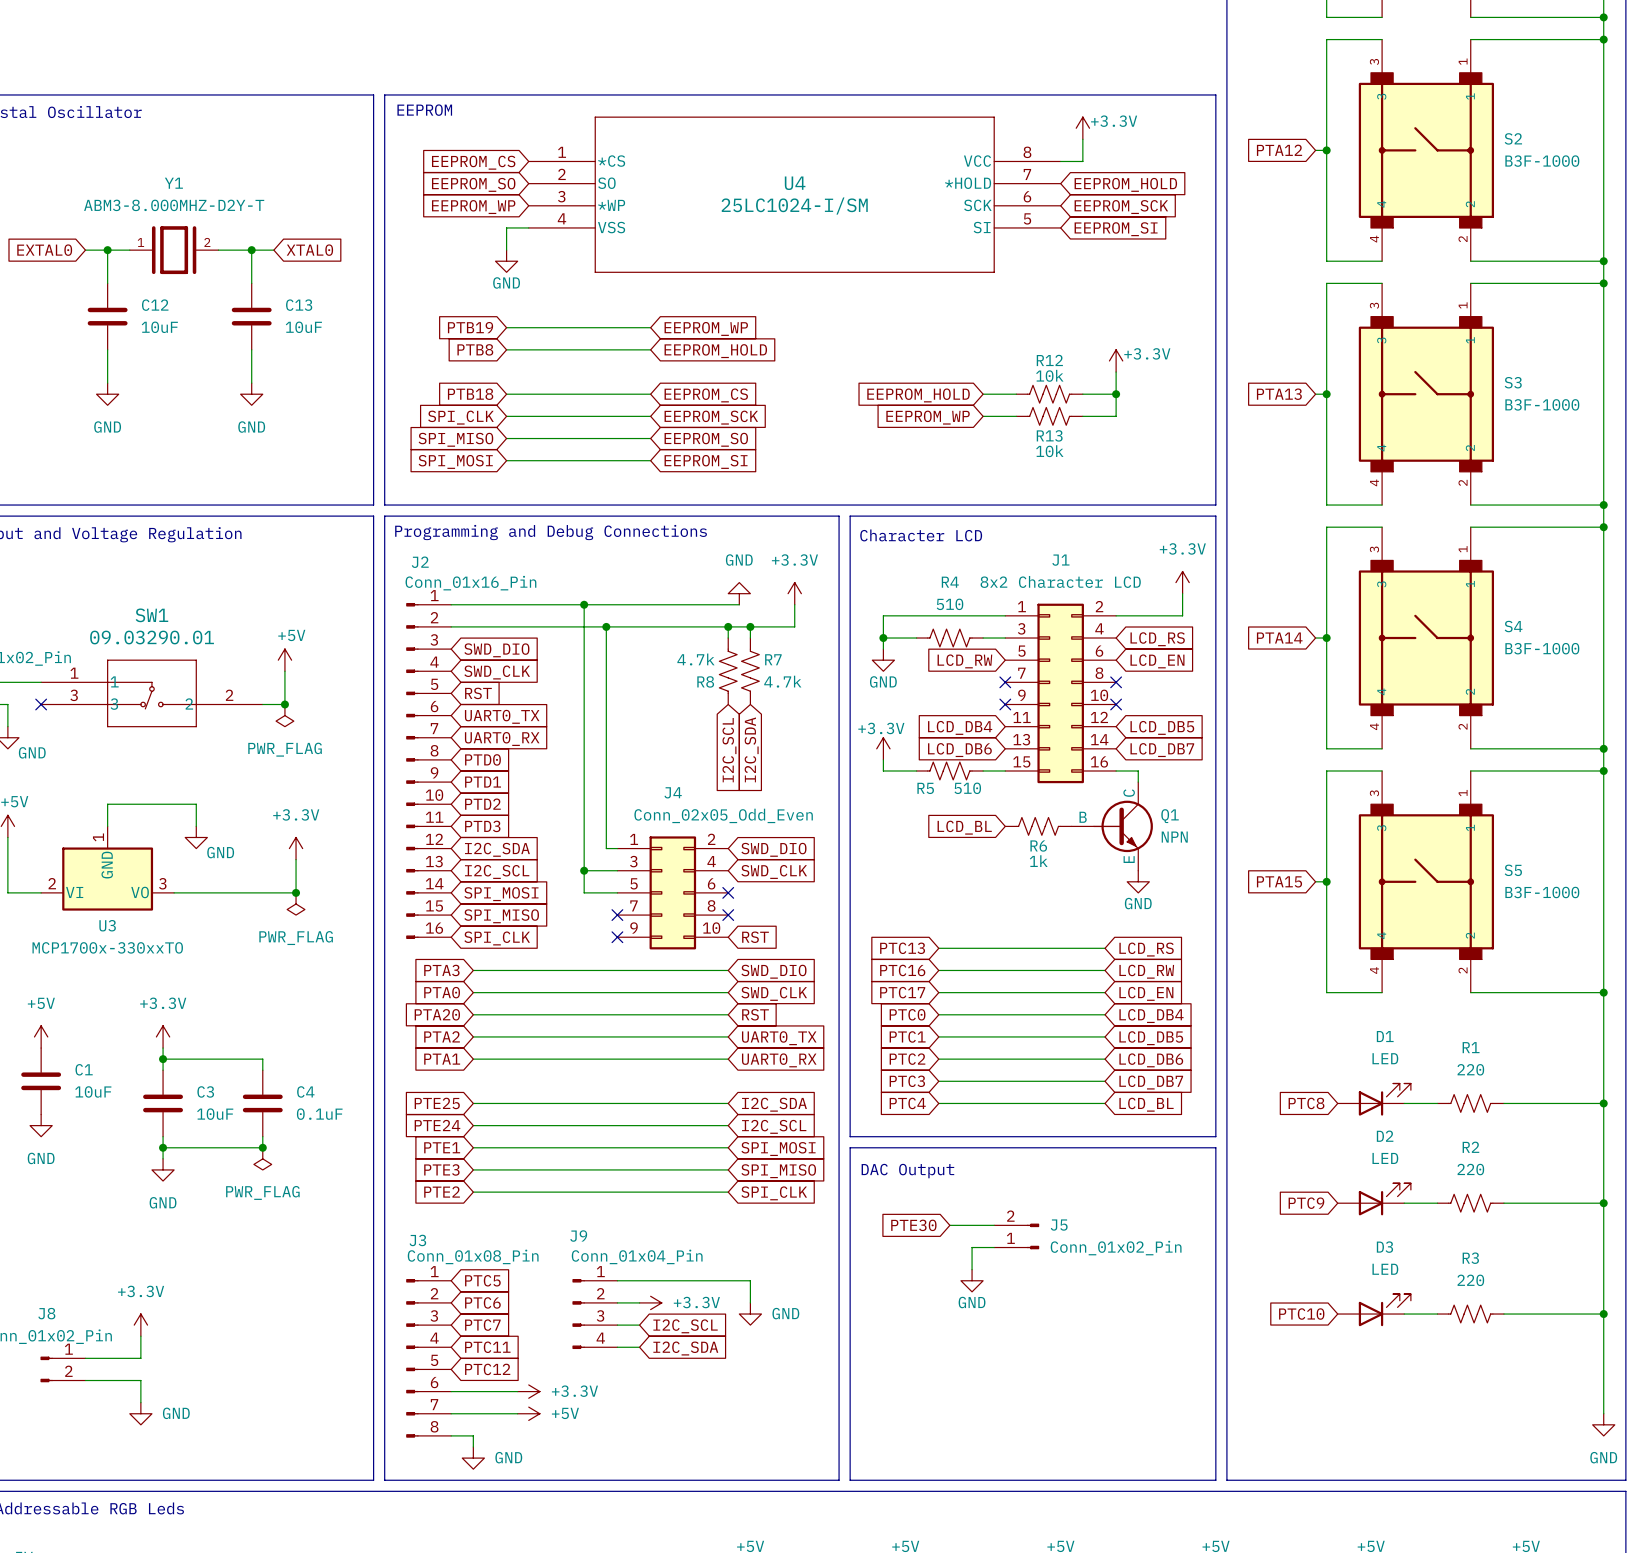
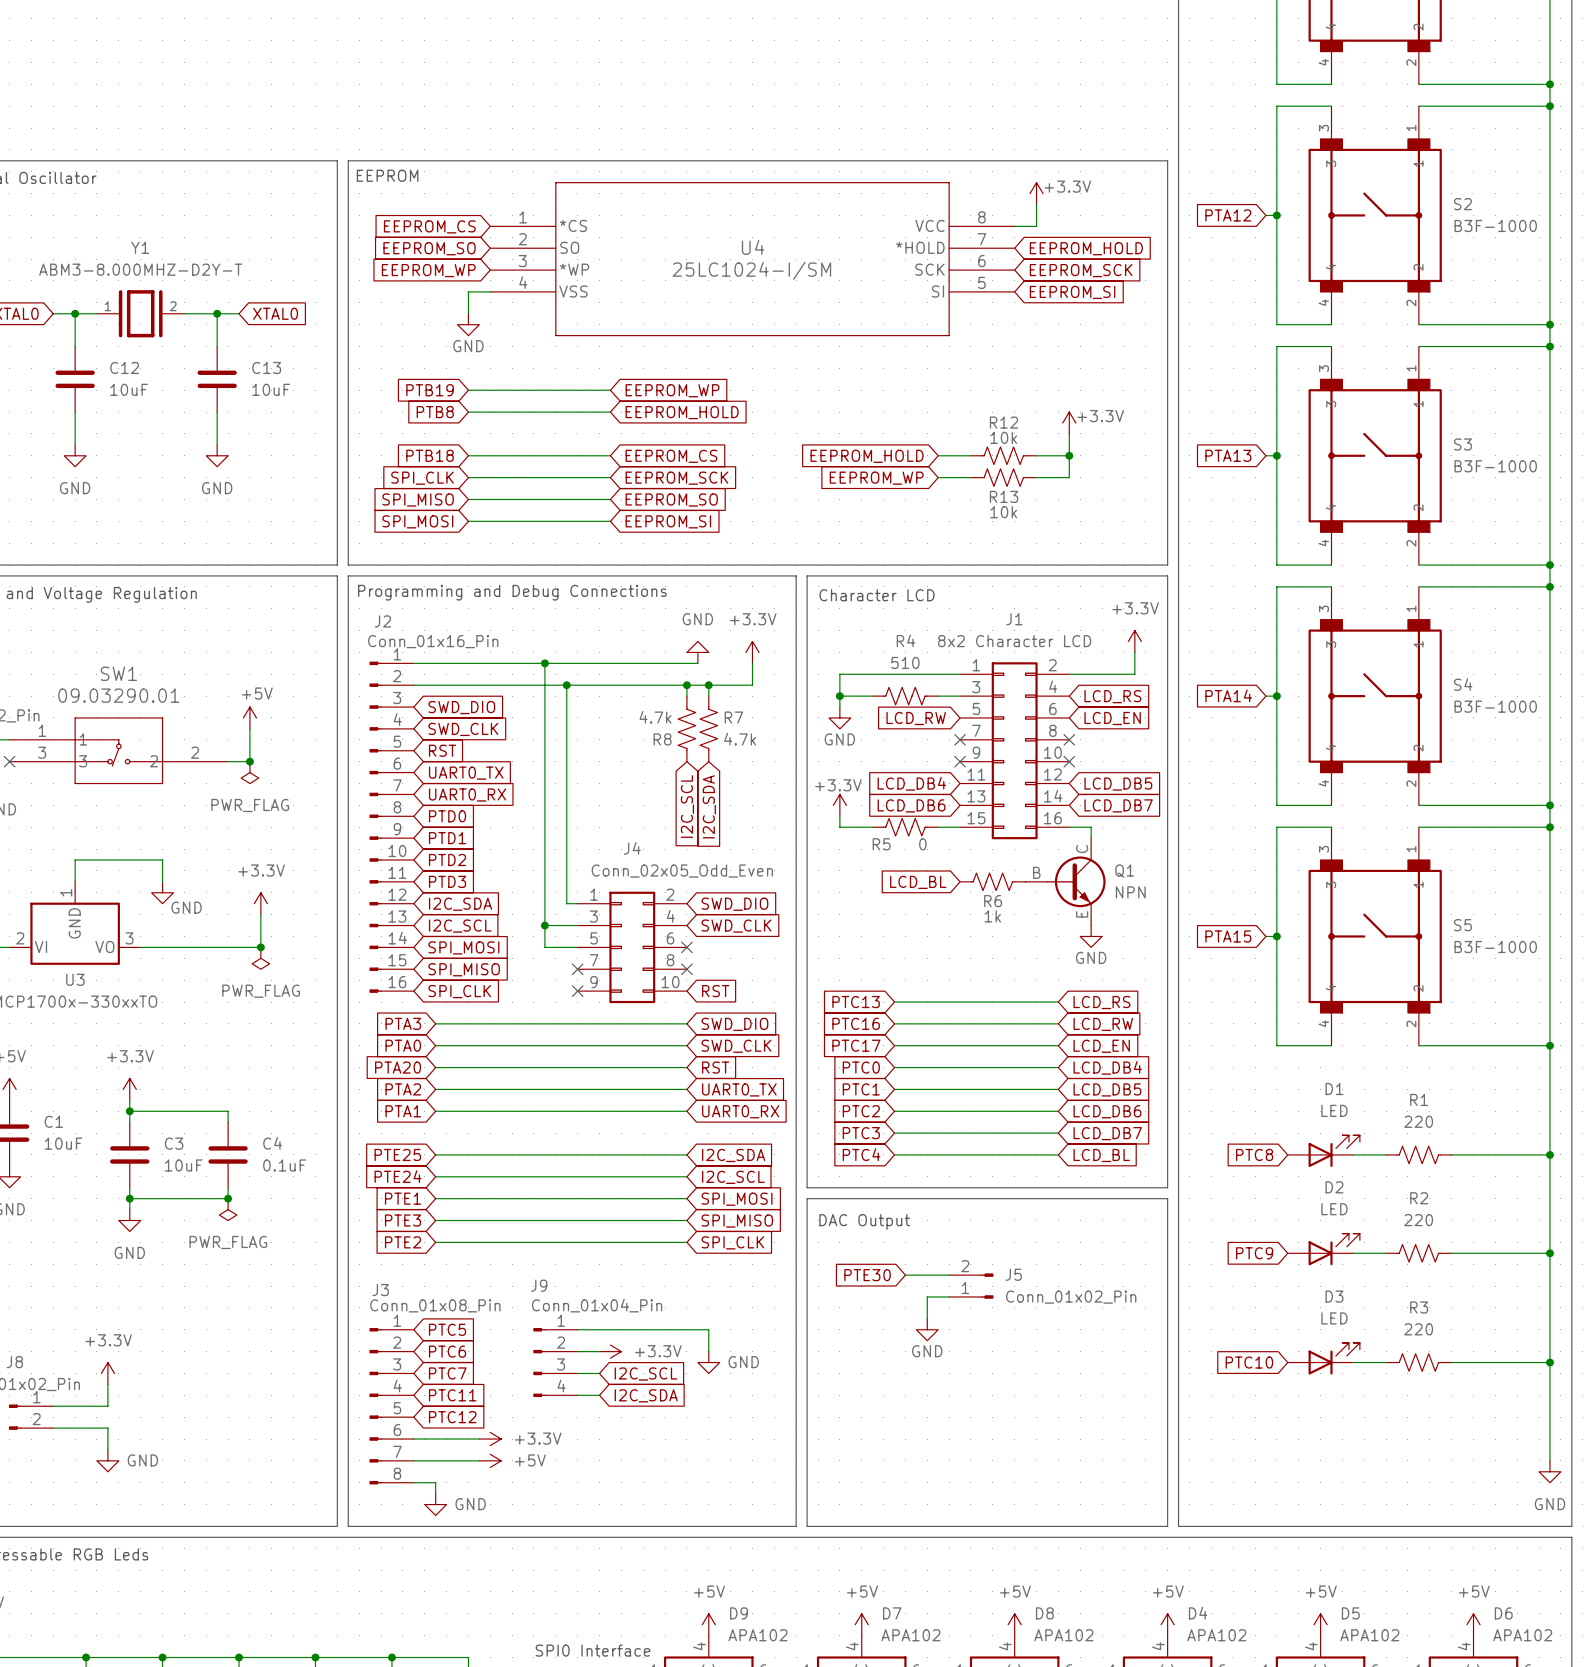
R5 value: 510 (967, 788) -> 0 (922, 844)

